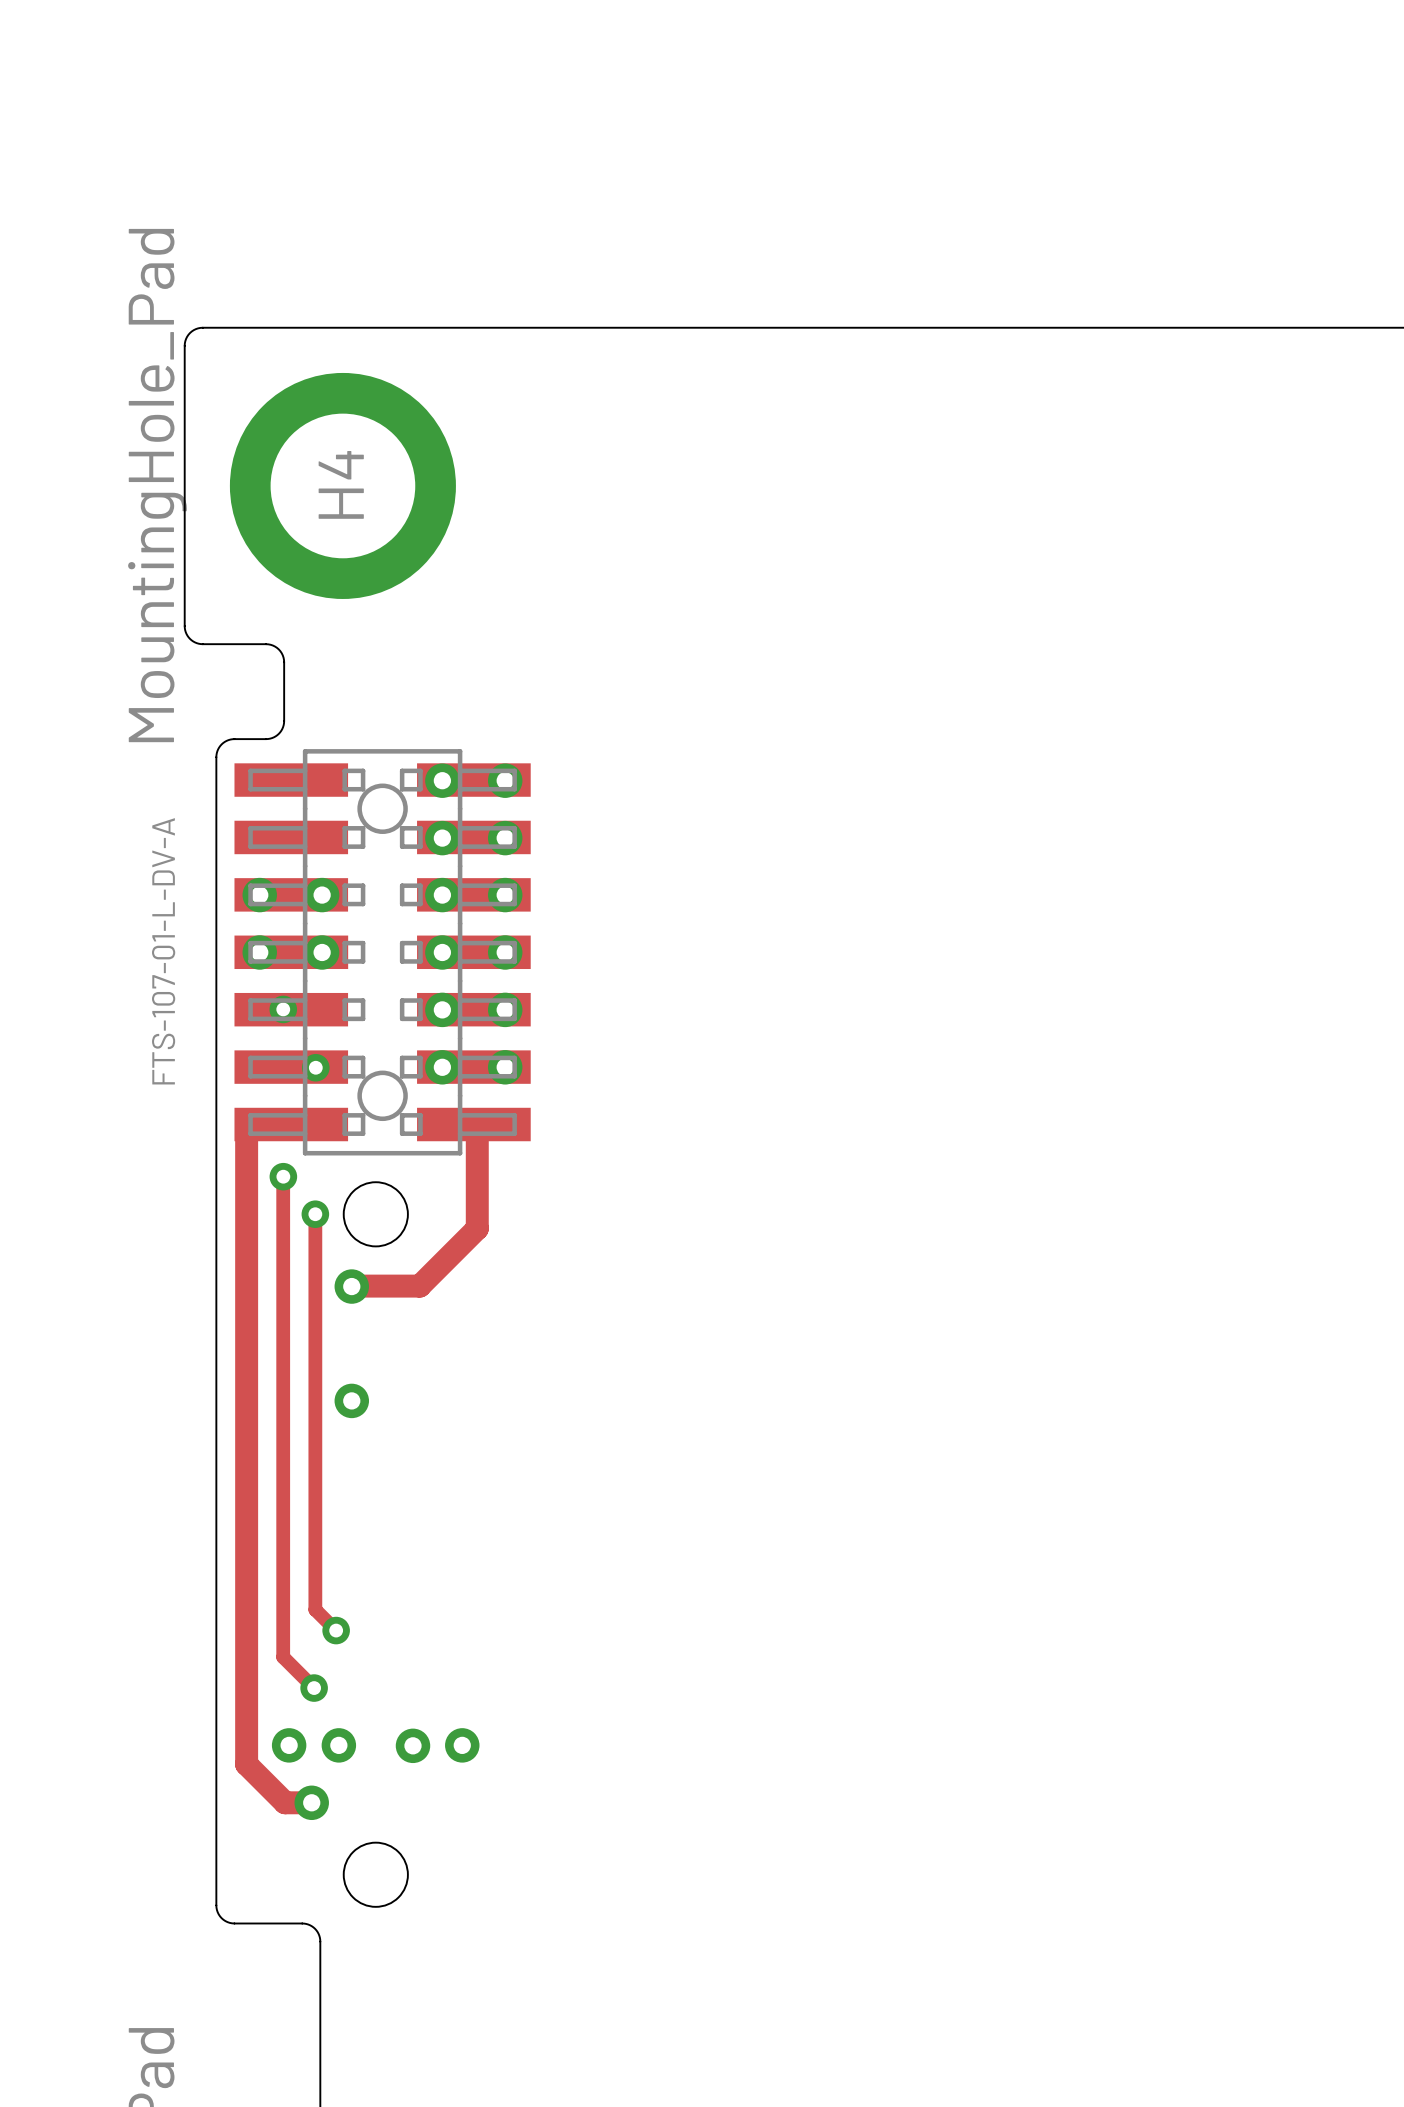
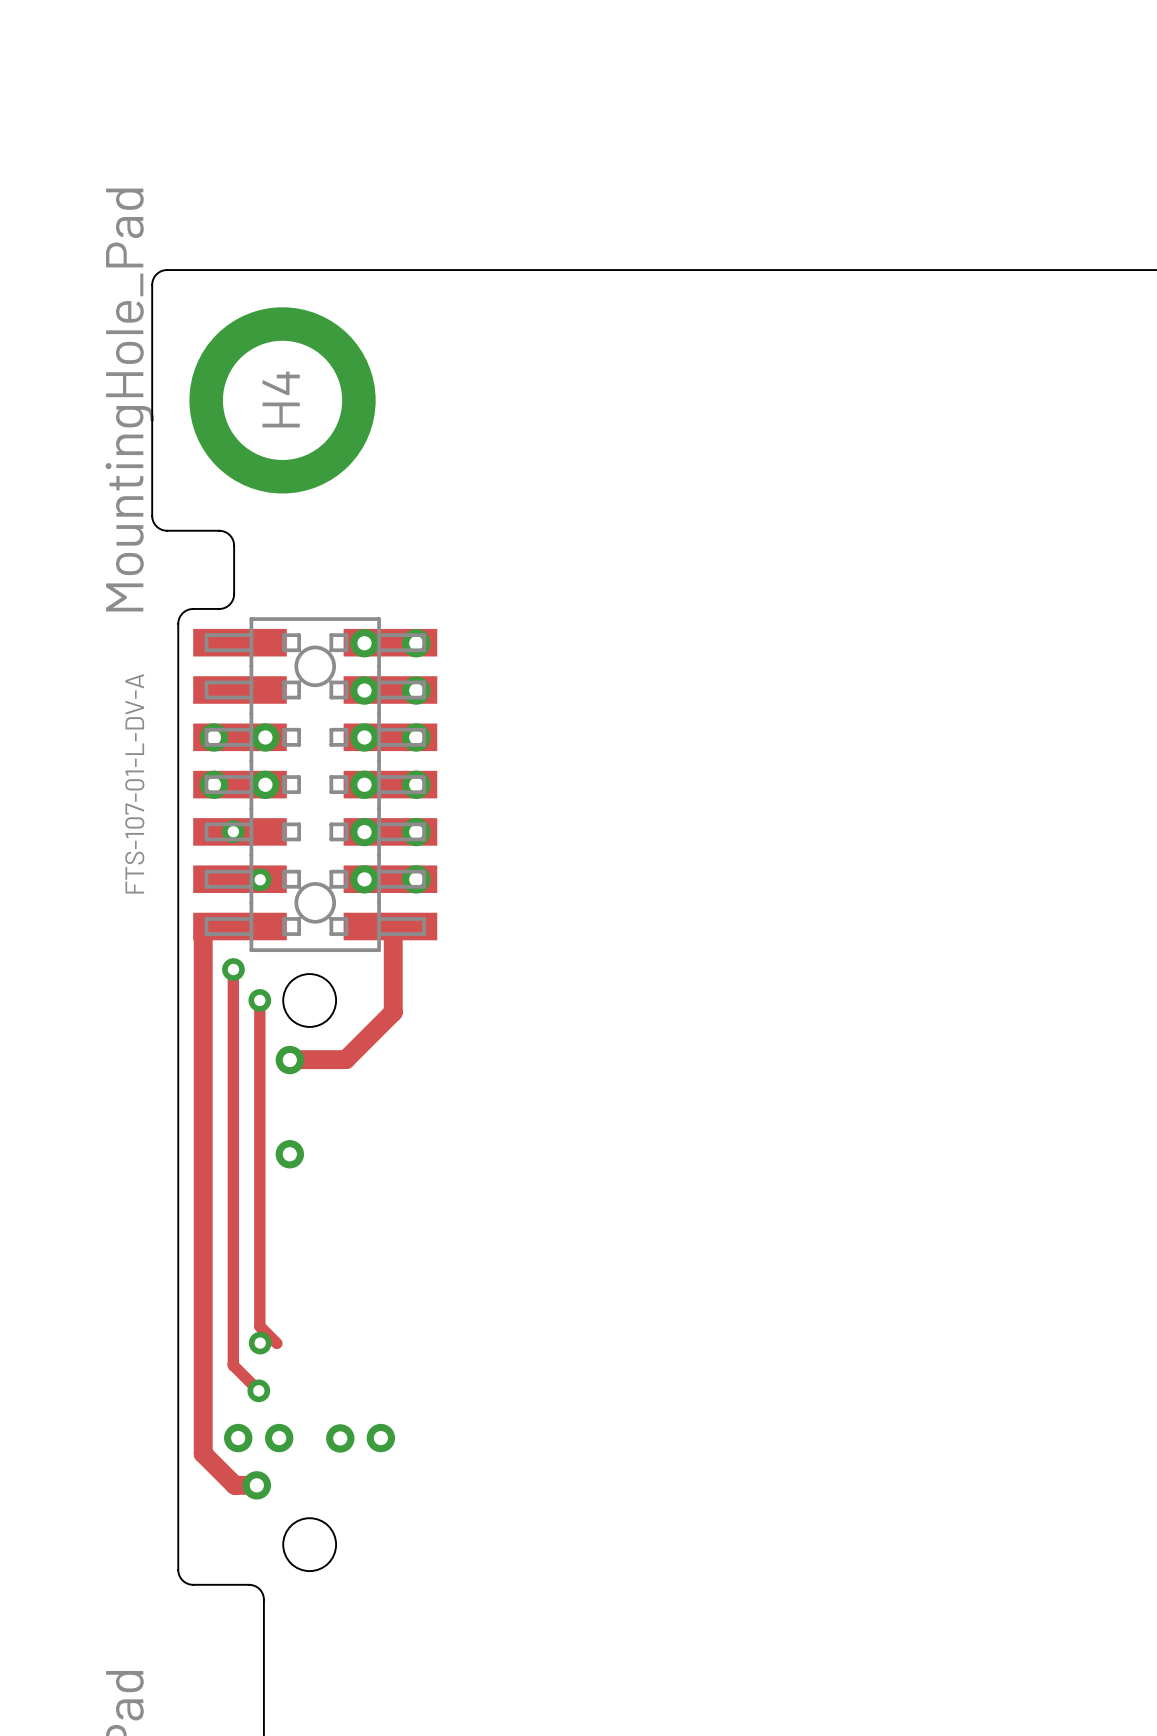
via position: (336, 1630) -> (260, 1343)

